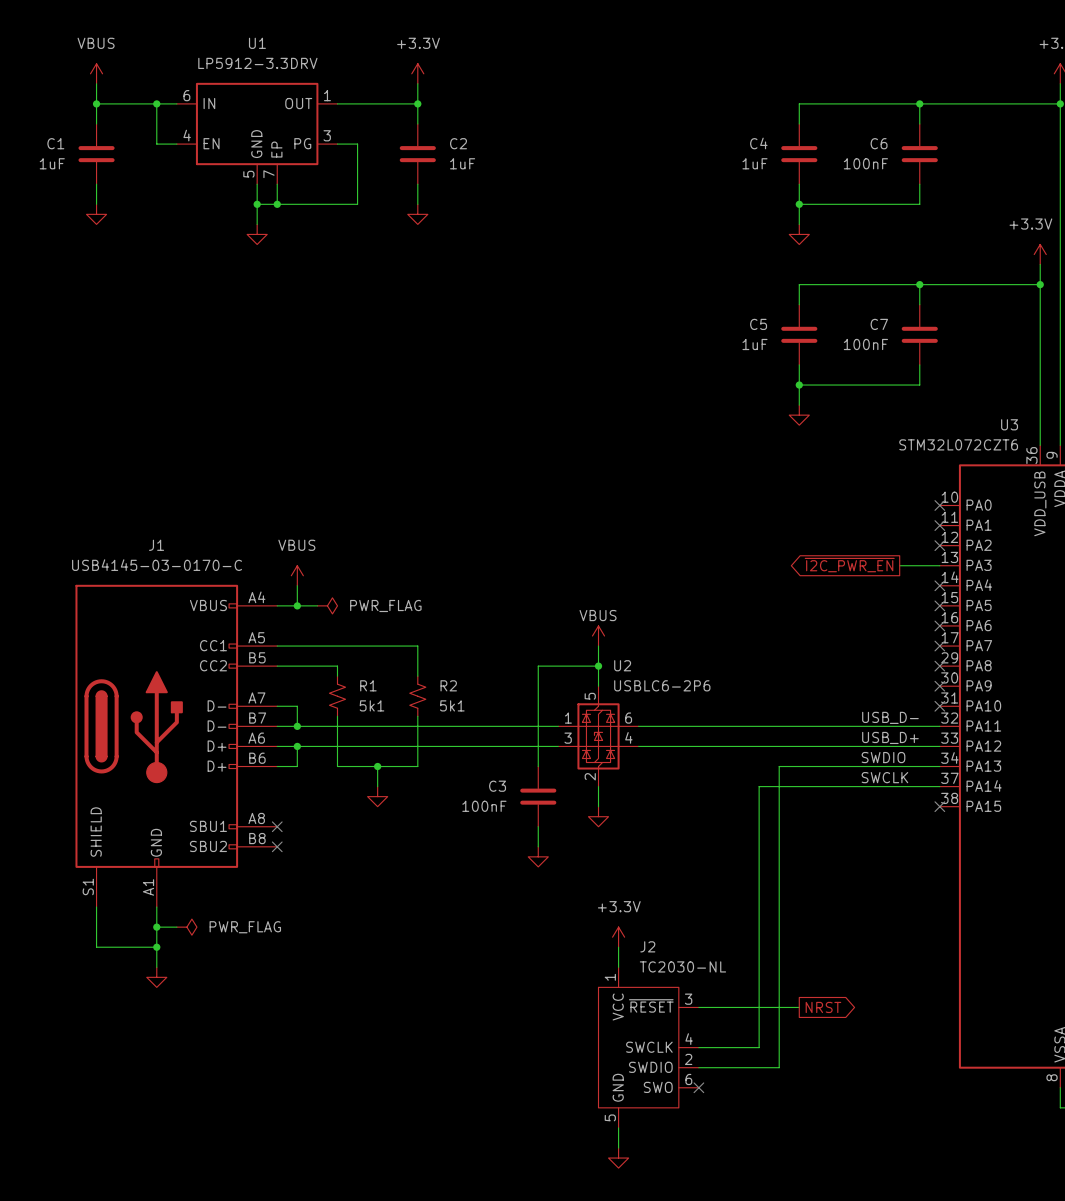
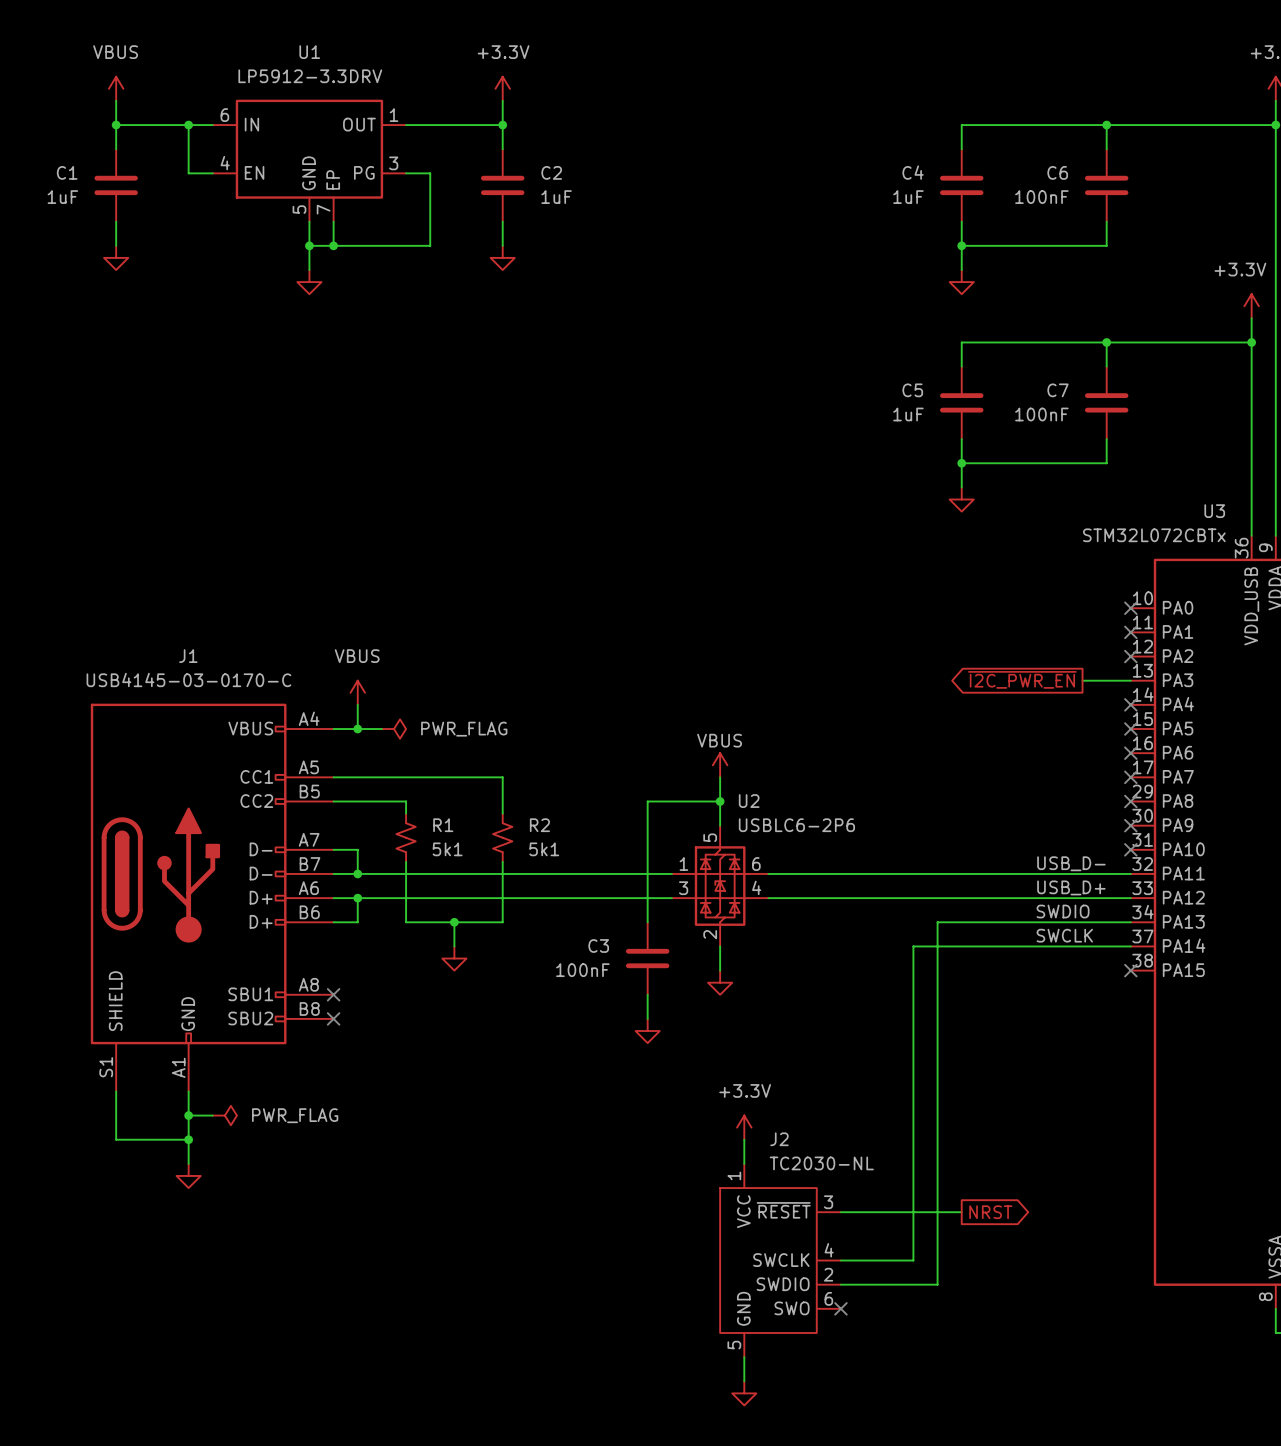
U3 value: STM32L072CZT6 (958, 444) -> STM32L072CBTx (1154, 535)

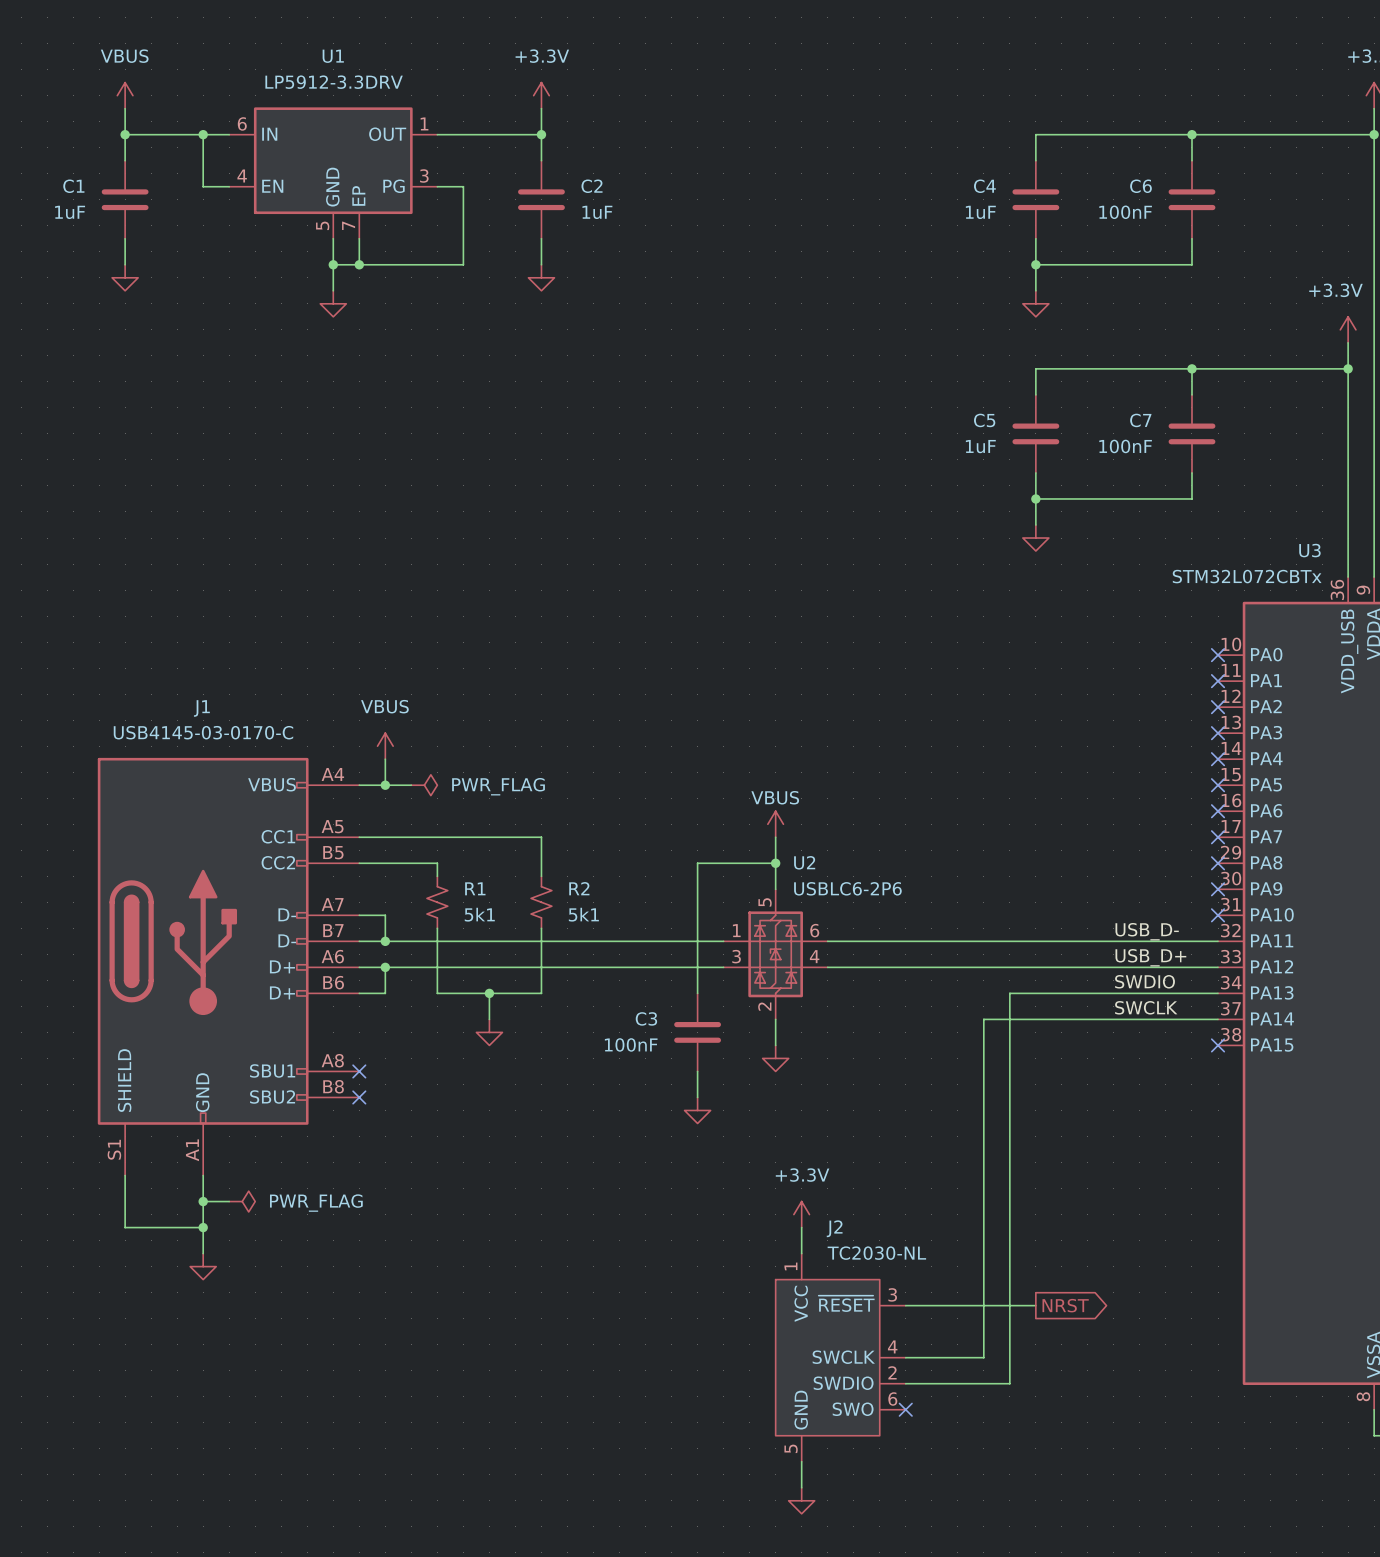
global label: ~{I2C_PWR_EN} (1022, 679) -> none
wire: (1082, 680) (1130, 680) -> none
no-connect mark: none -> (1218, 733)

